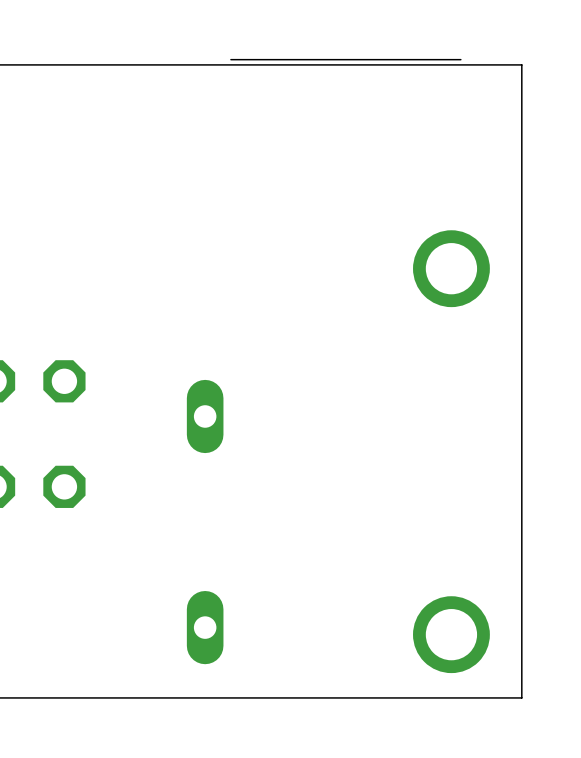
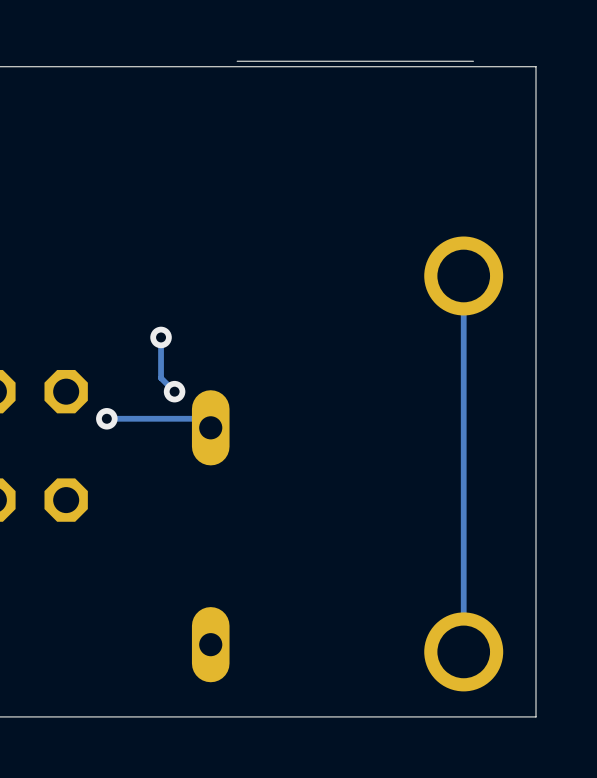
track: none -> (463, 275) (463, 651)
track: none -> (161, 337) (161, 378) (174, 391)
via: none -> (161, 337)
via: none -> (174, 391)
track: none -> (106, 418) (210, 418) (210, 427)
via: none -> (106, 418)

